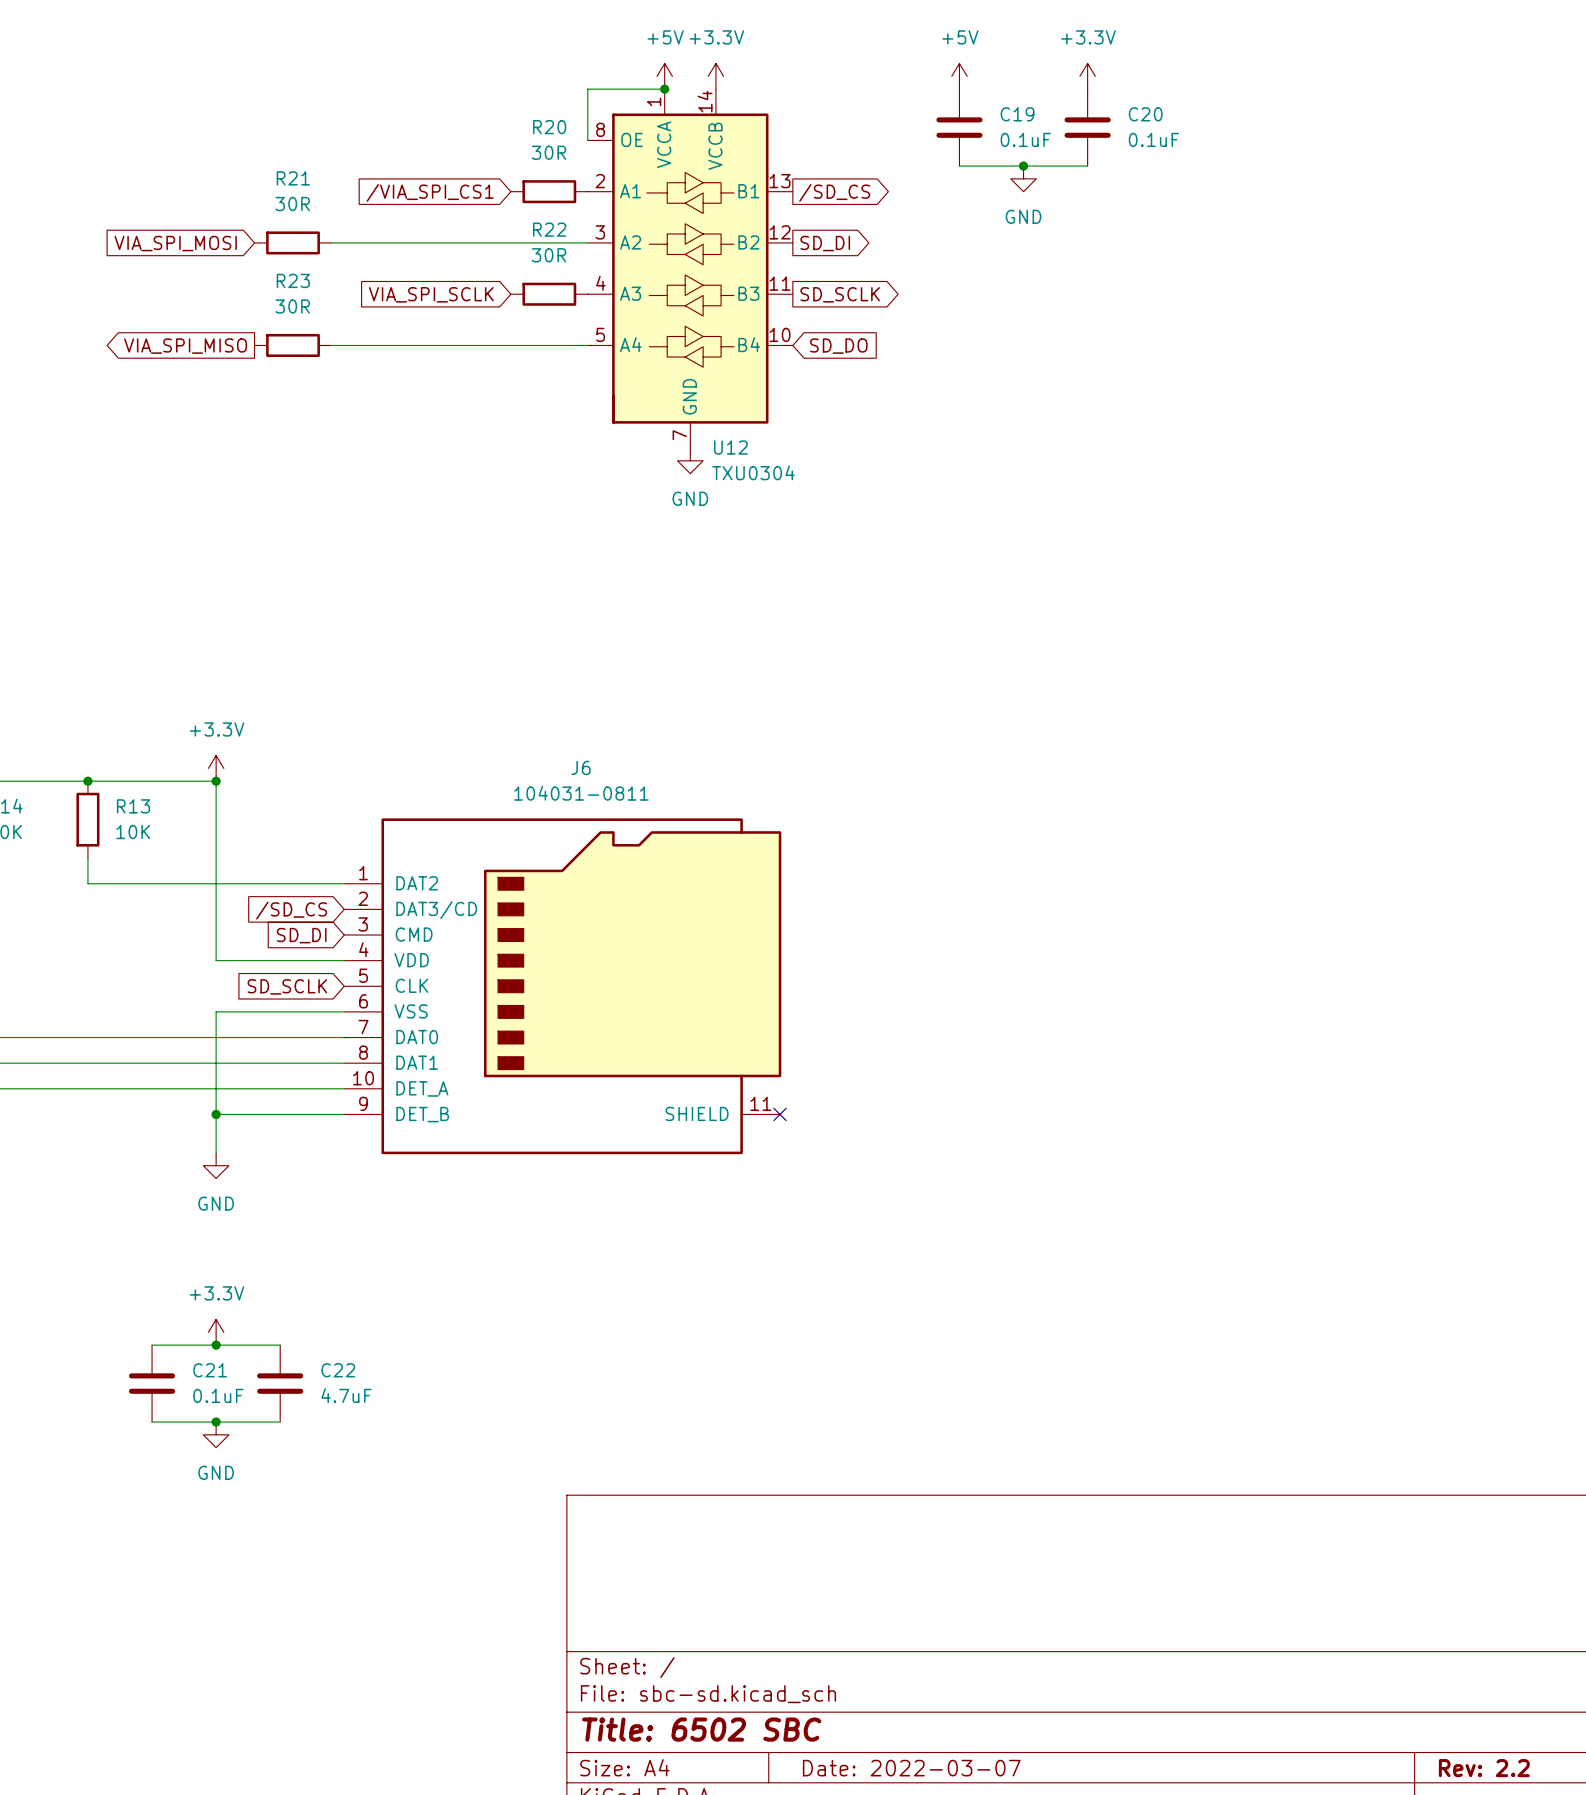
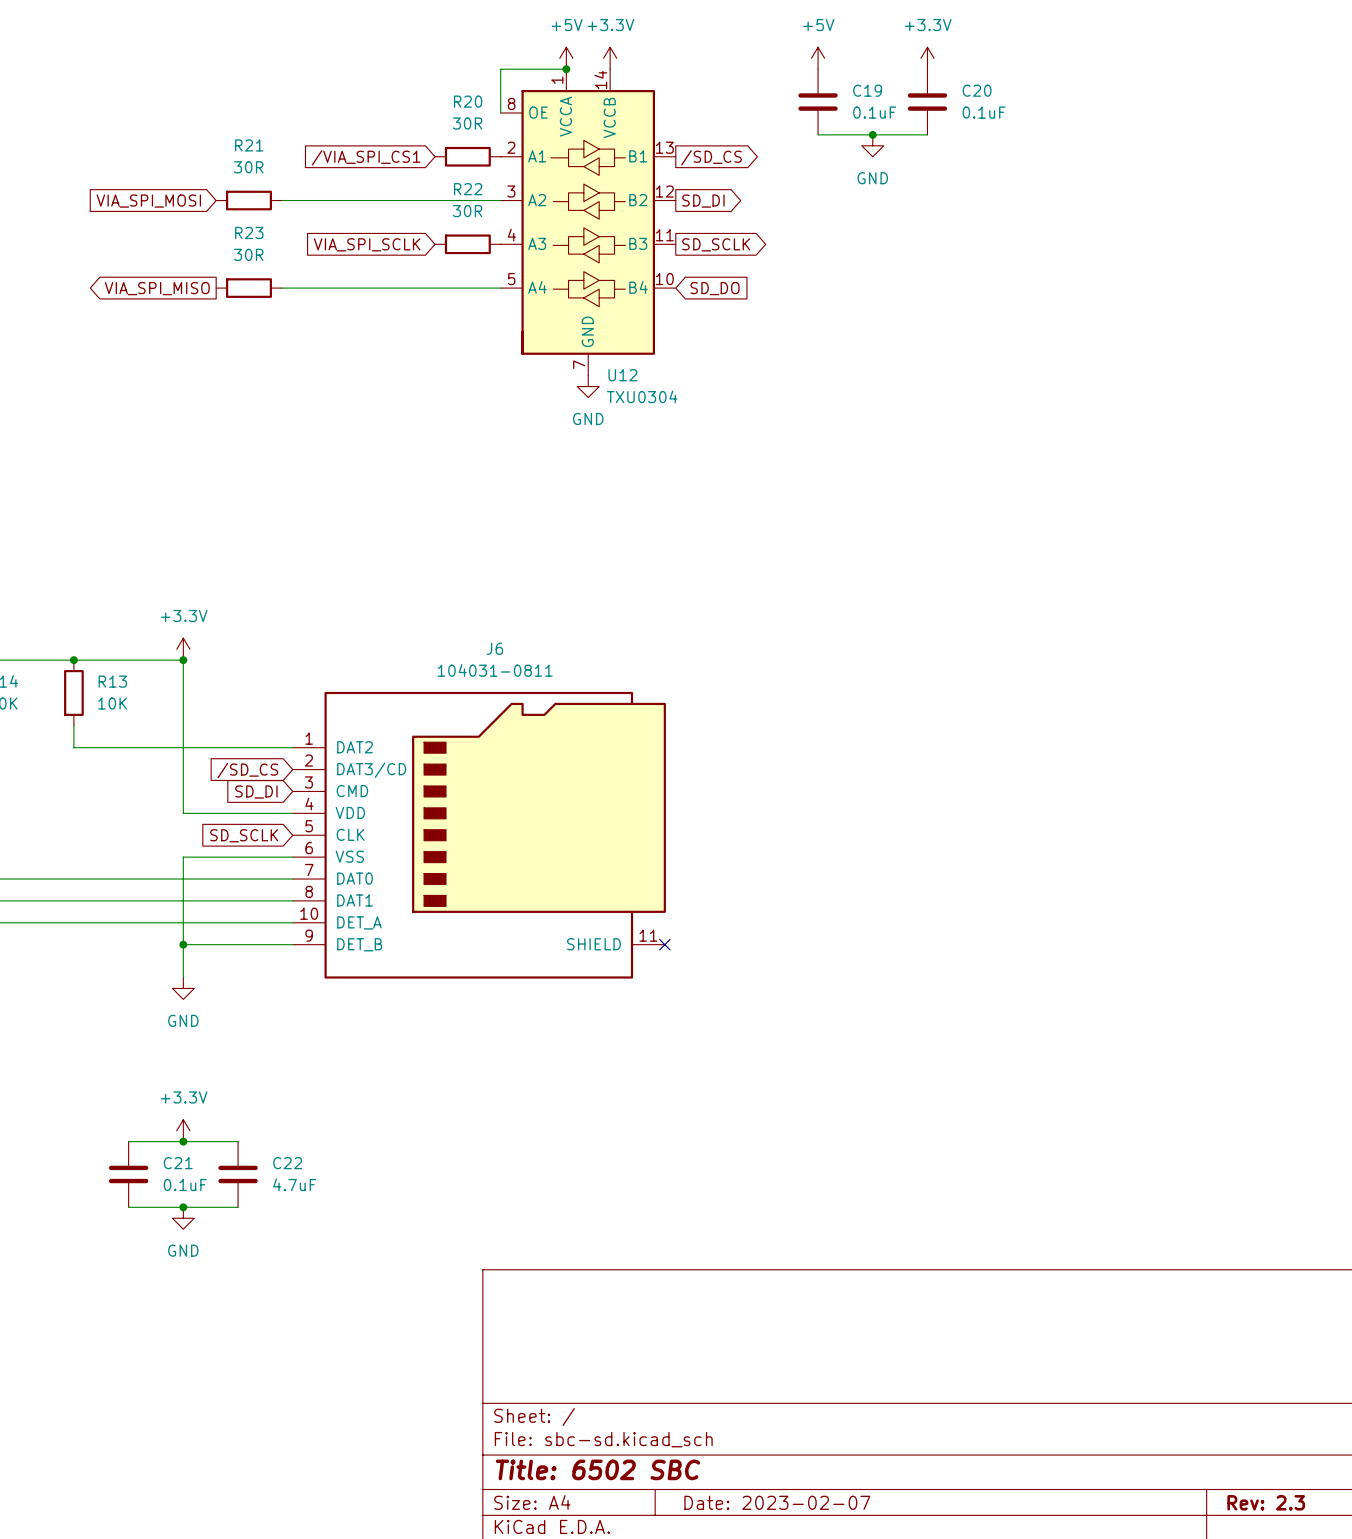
title block: Date: 2022-03-07 (911, 1768) -> Date: 2023-02-07 (777, 1502)
title block: Rev: 2.2 (1484, 1768) -> Rev: 2.3 (1266, 1502)

